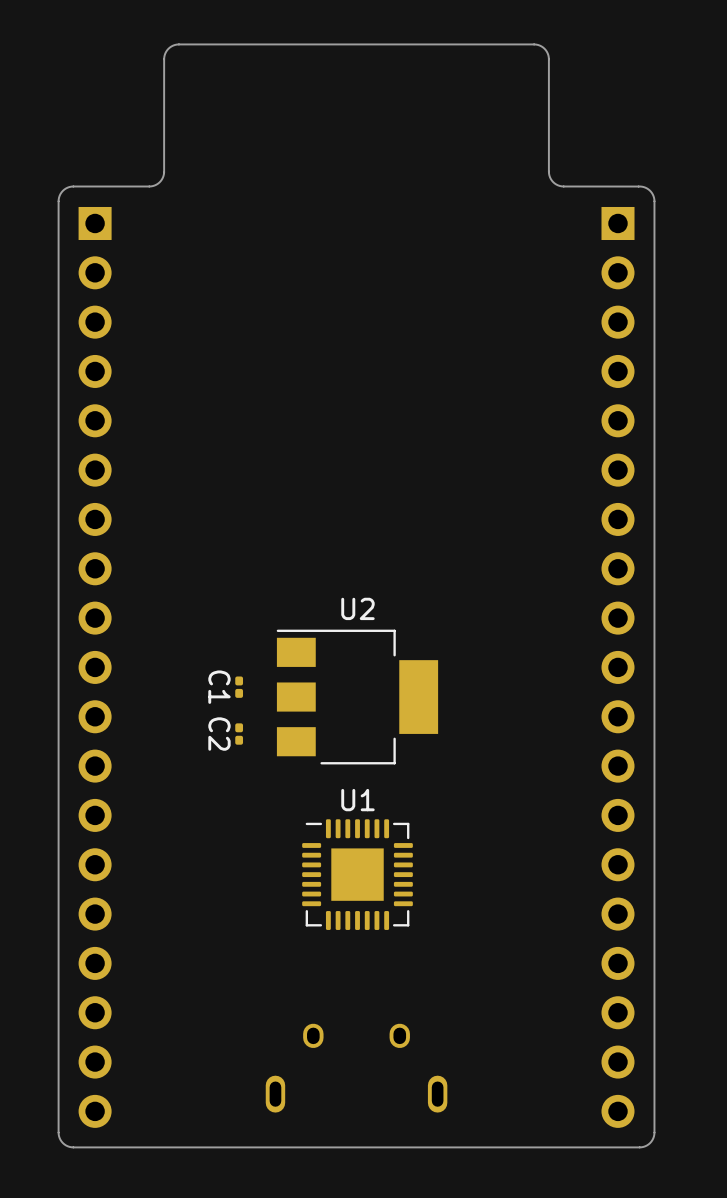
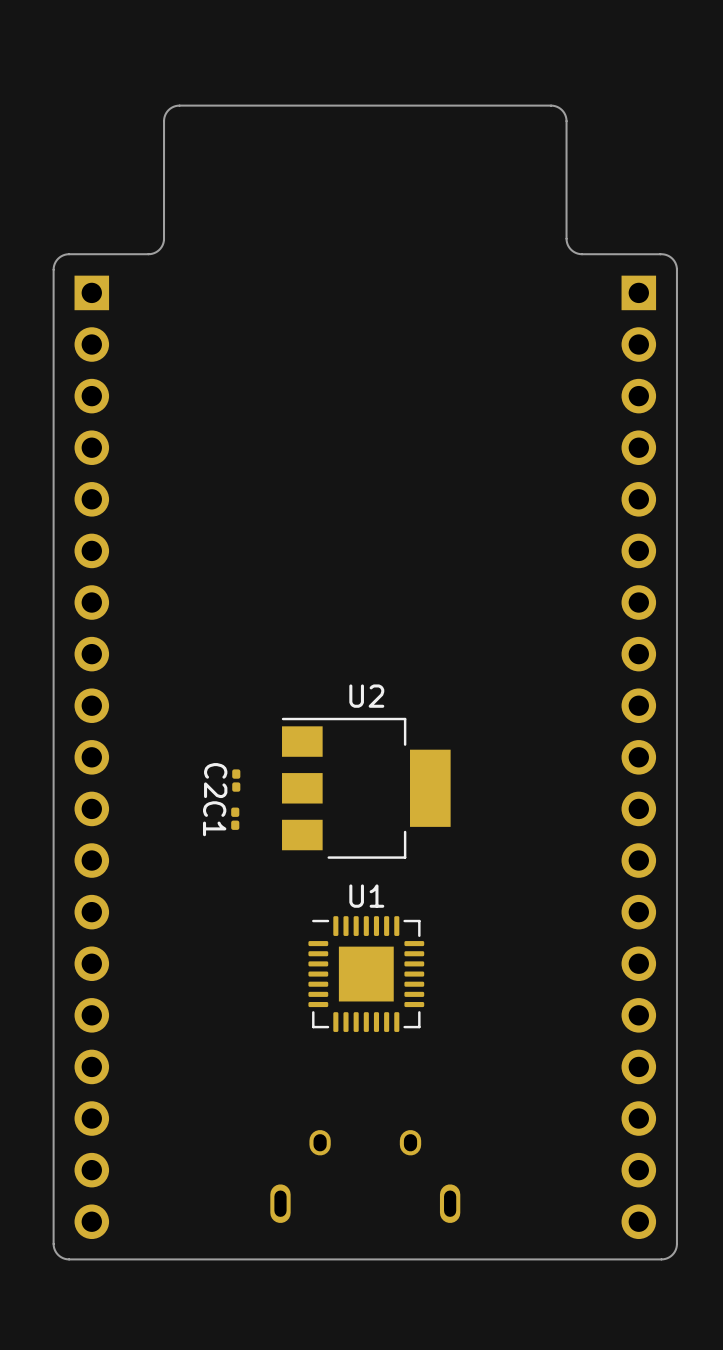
C1 position: (239, 687) -> (235, 818)
C2 position: (239, 734) -> (236, 780)

